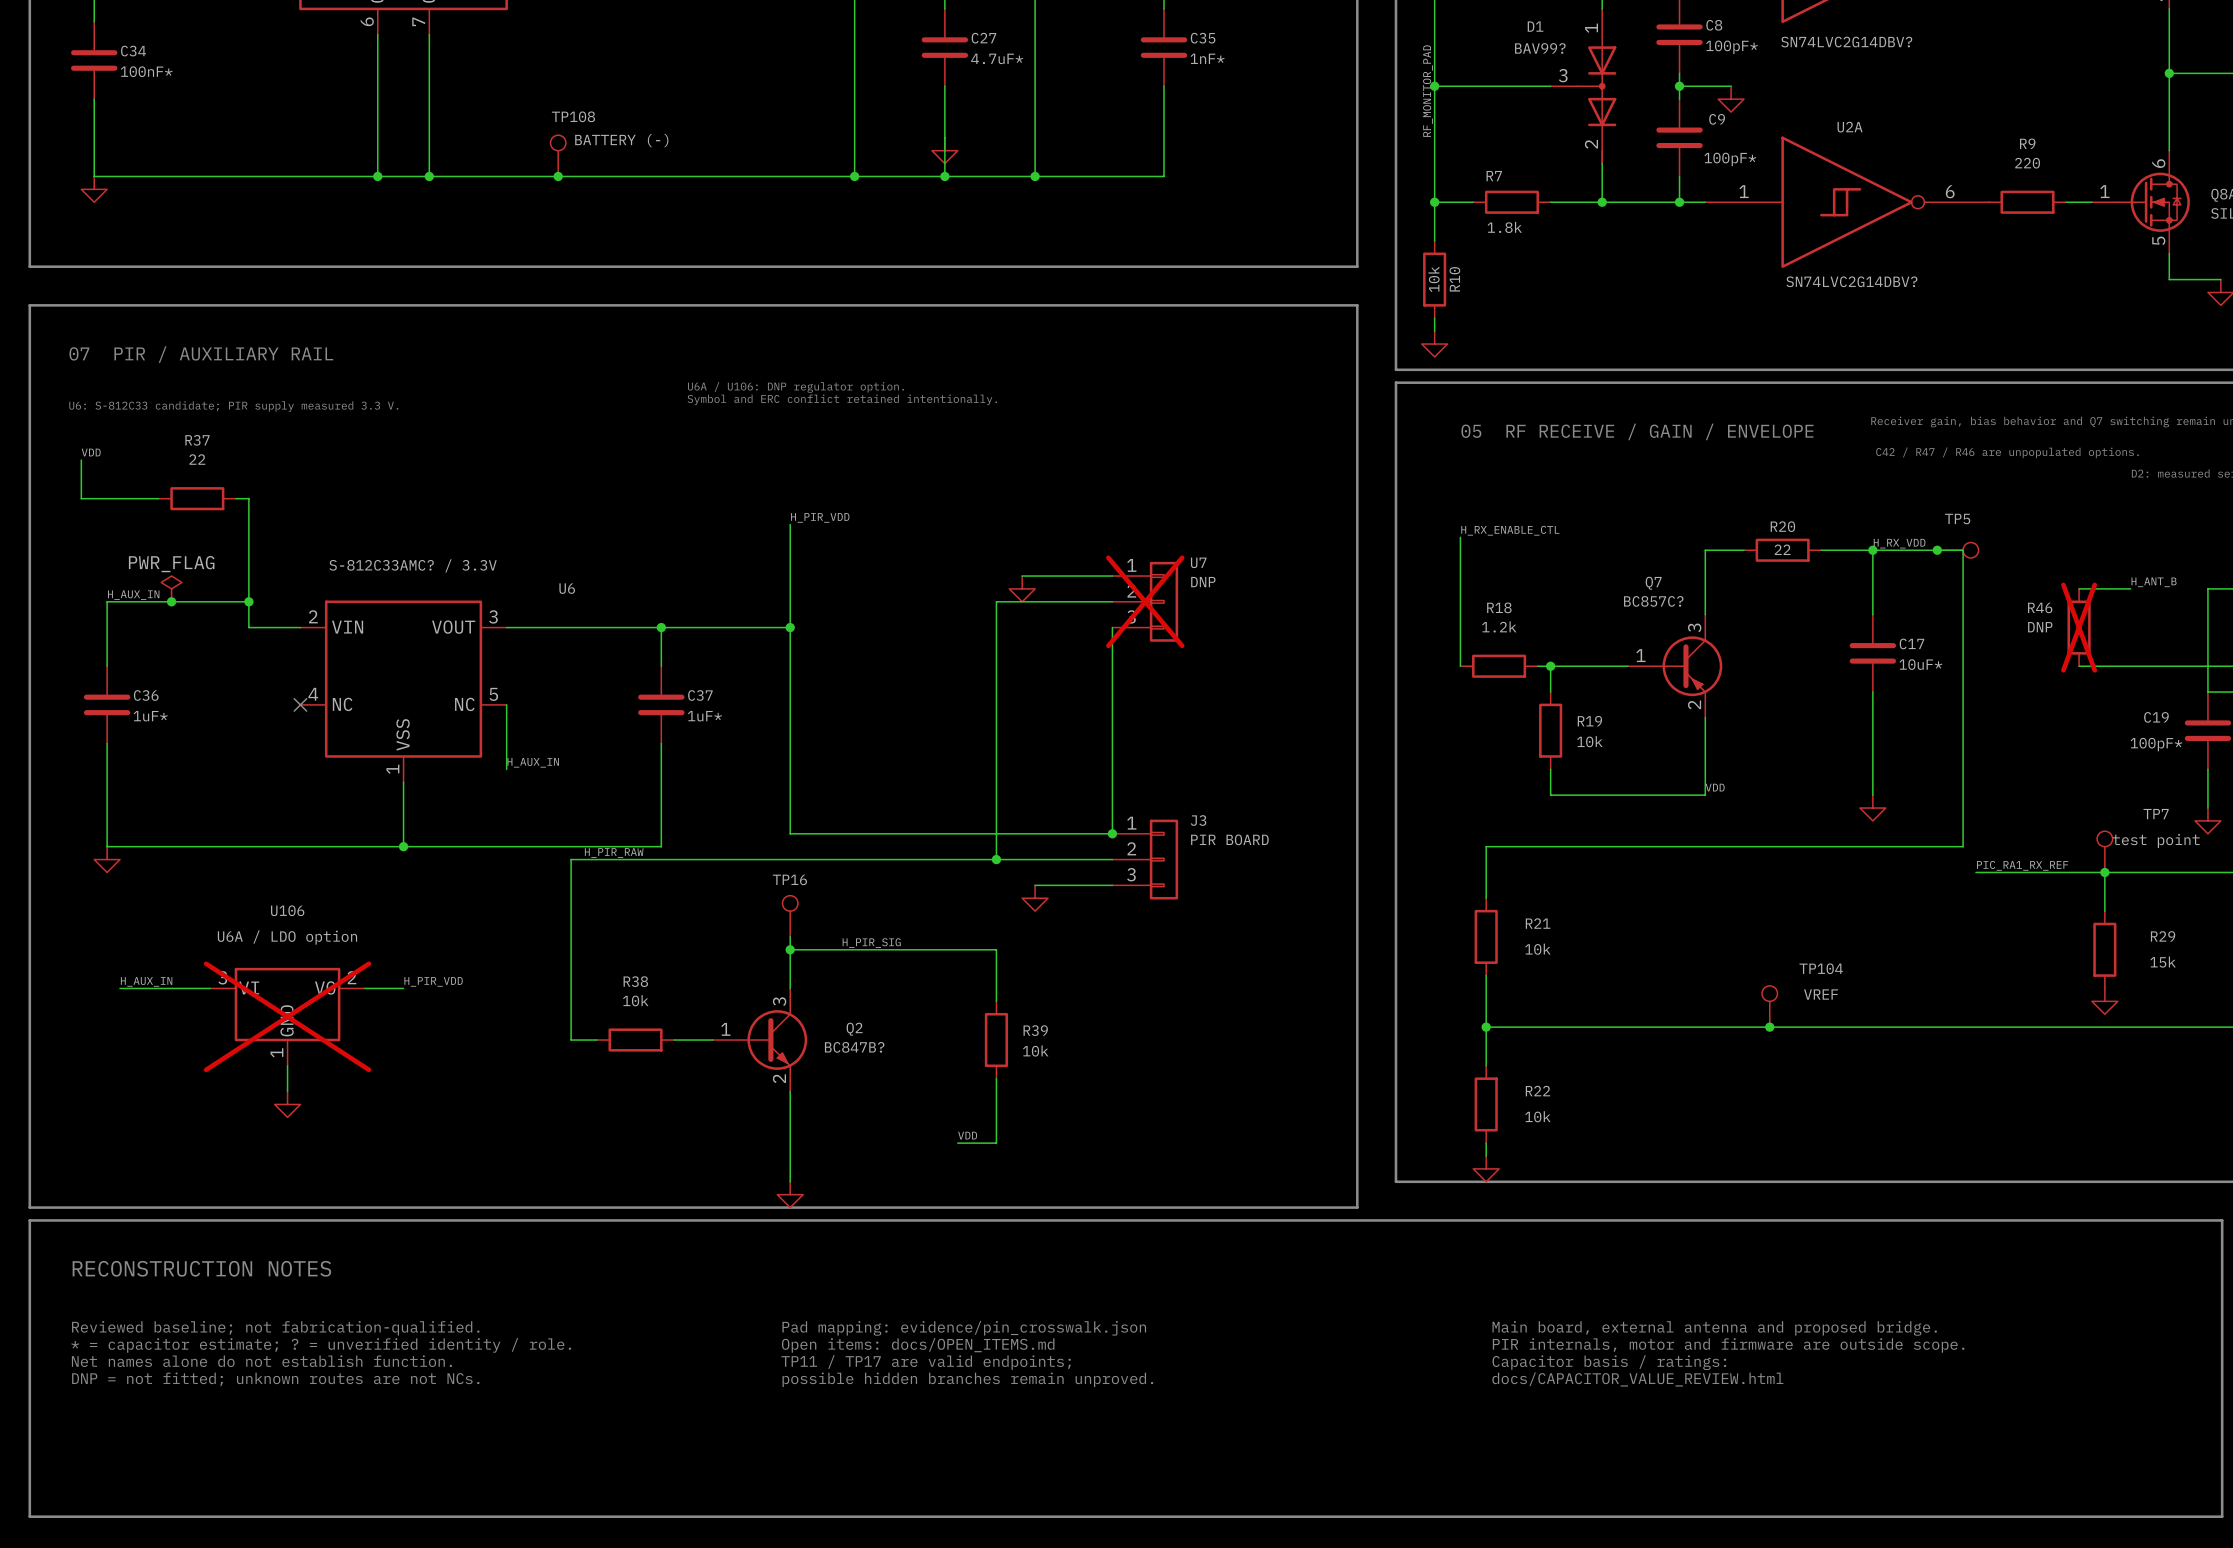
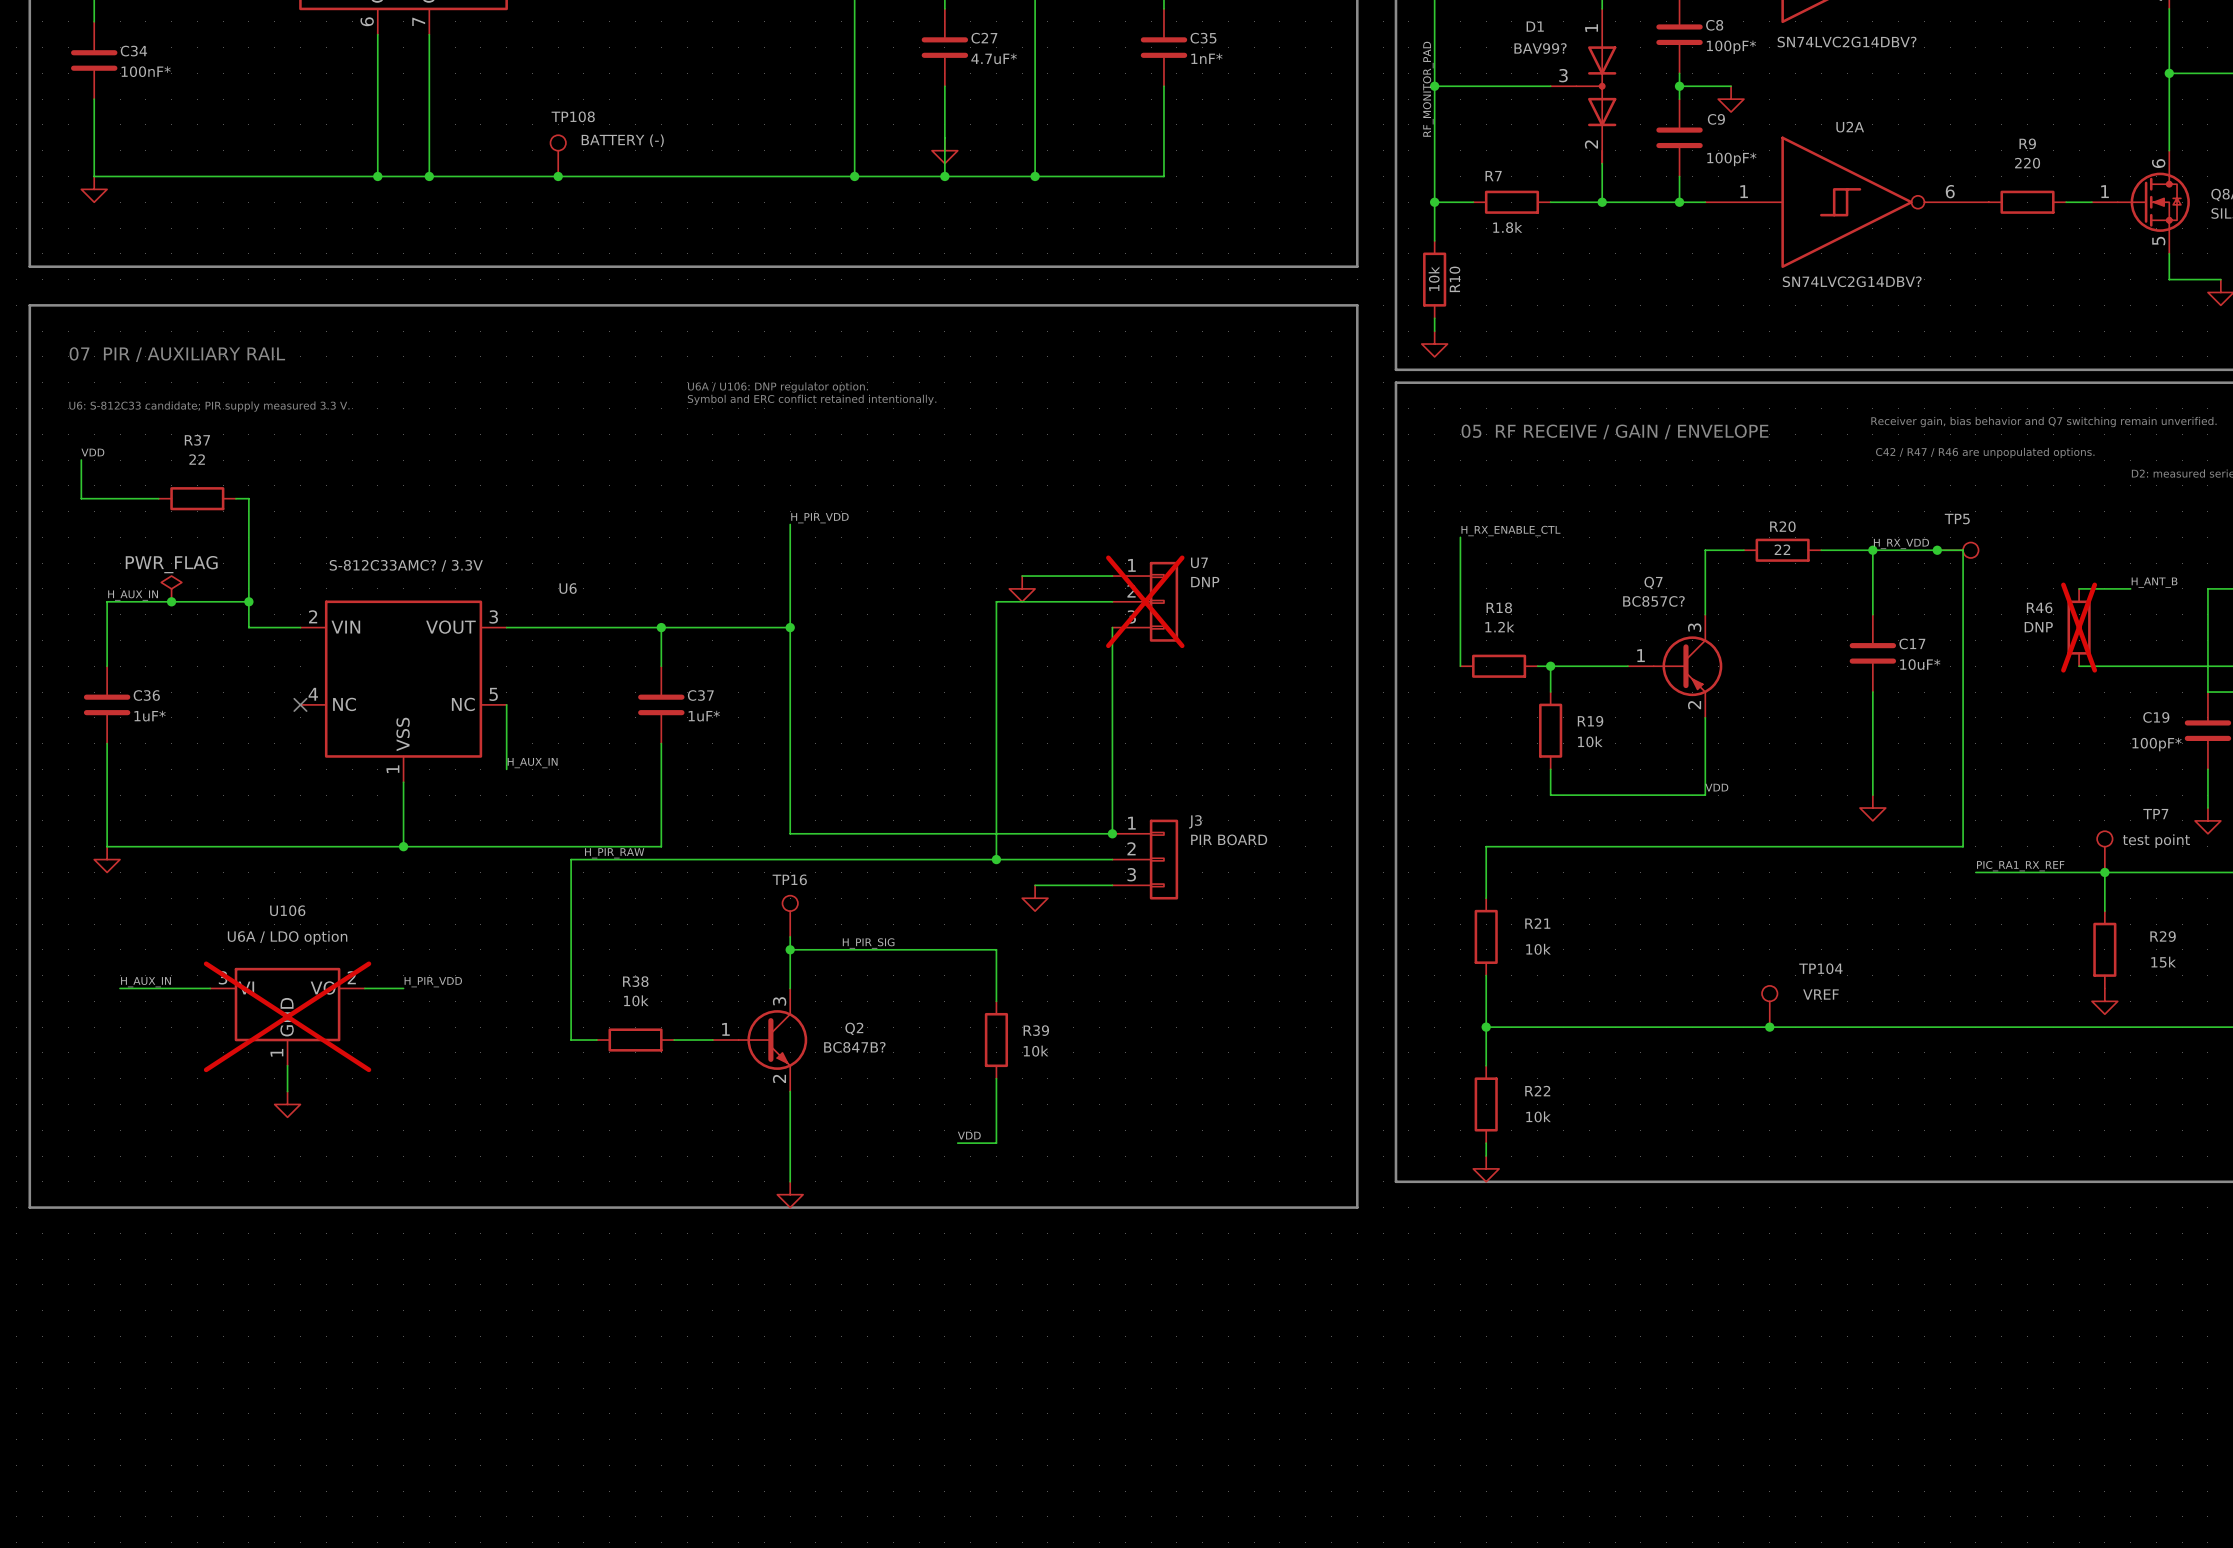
line: (29, 1220) (2222, 1220) (2222, 1516) (29, 1516) (29, 1220) -> none
text: RECONSTRUCTION NOTES (201, 1268) -> none
text: Reviewed baseline; not fabrication-qualified. (275, 1328) -> none
text: Pad mapping: evidence/pin_crosswalk.json (964, 1328) -> none
text: Main board, external antenna and proposed bridge. (1714, 1328) -> none
text: * = capacitor estimate; ? = unverified identity / role. (321, 1345) -> none
text: Open items: docs/OPEN_ITEMS.md (918, 1345) -> none
text: PIR internals, motor and firmware are outside scope. (1728, 1345) -> none
text: Net names alone do not establish function. (261, 1361) -> none
text: TP11 / TP17 are valid endpoints; (926, 1362) -> none
text: Capacitor basis / ratings: (1609, 1362) -> none
text: DNP = not fitted; unknown routes are not NCs. (275, 1379) -> none
text: possible hidden branches remain unproved. (967, 1379) -> none
text: docs/CAPACITOR_VALUE_REVIEW.html (1637, 1379) -> none

